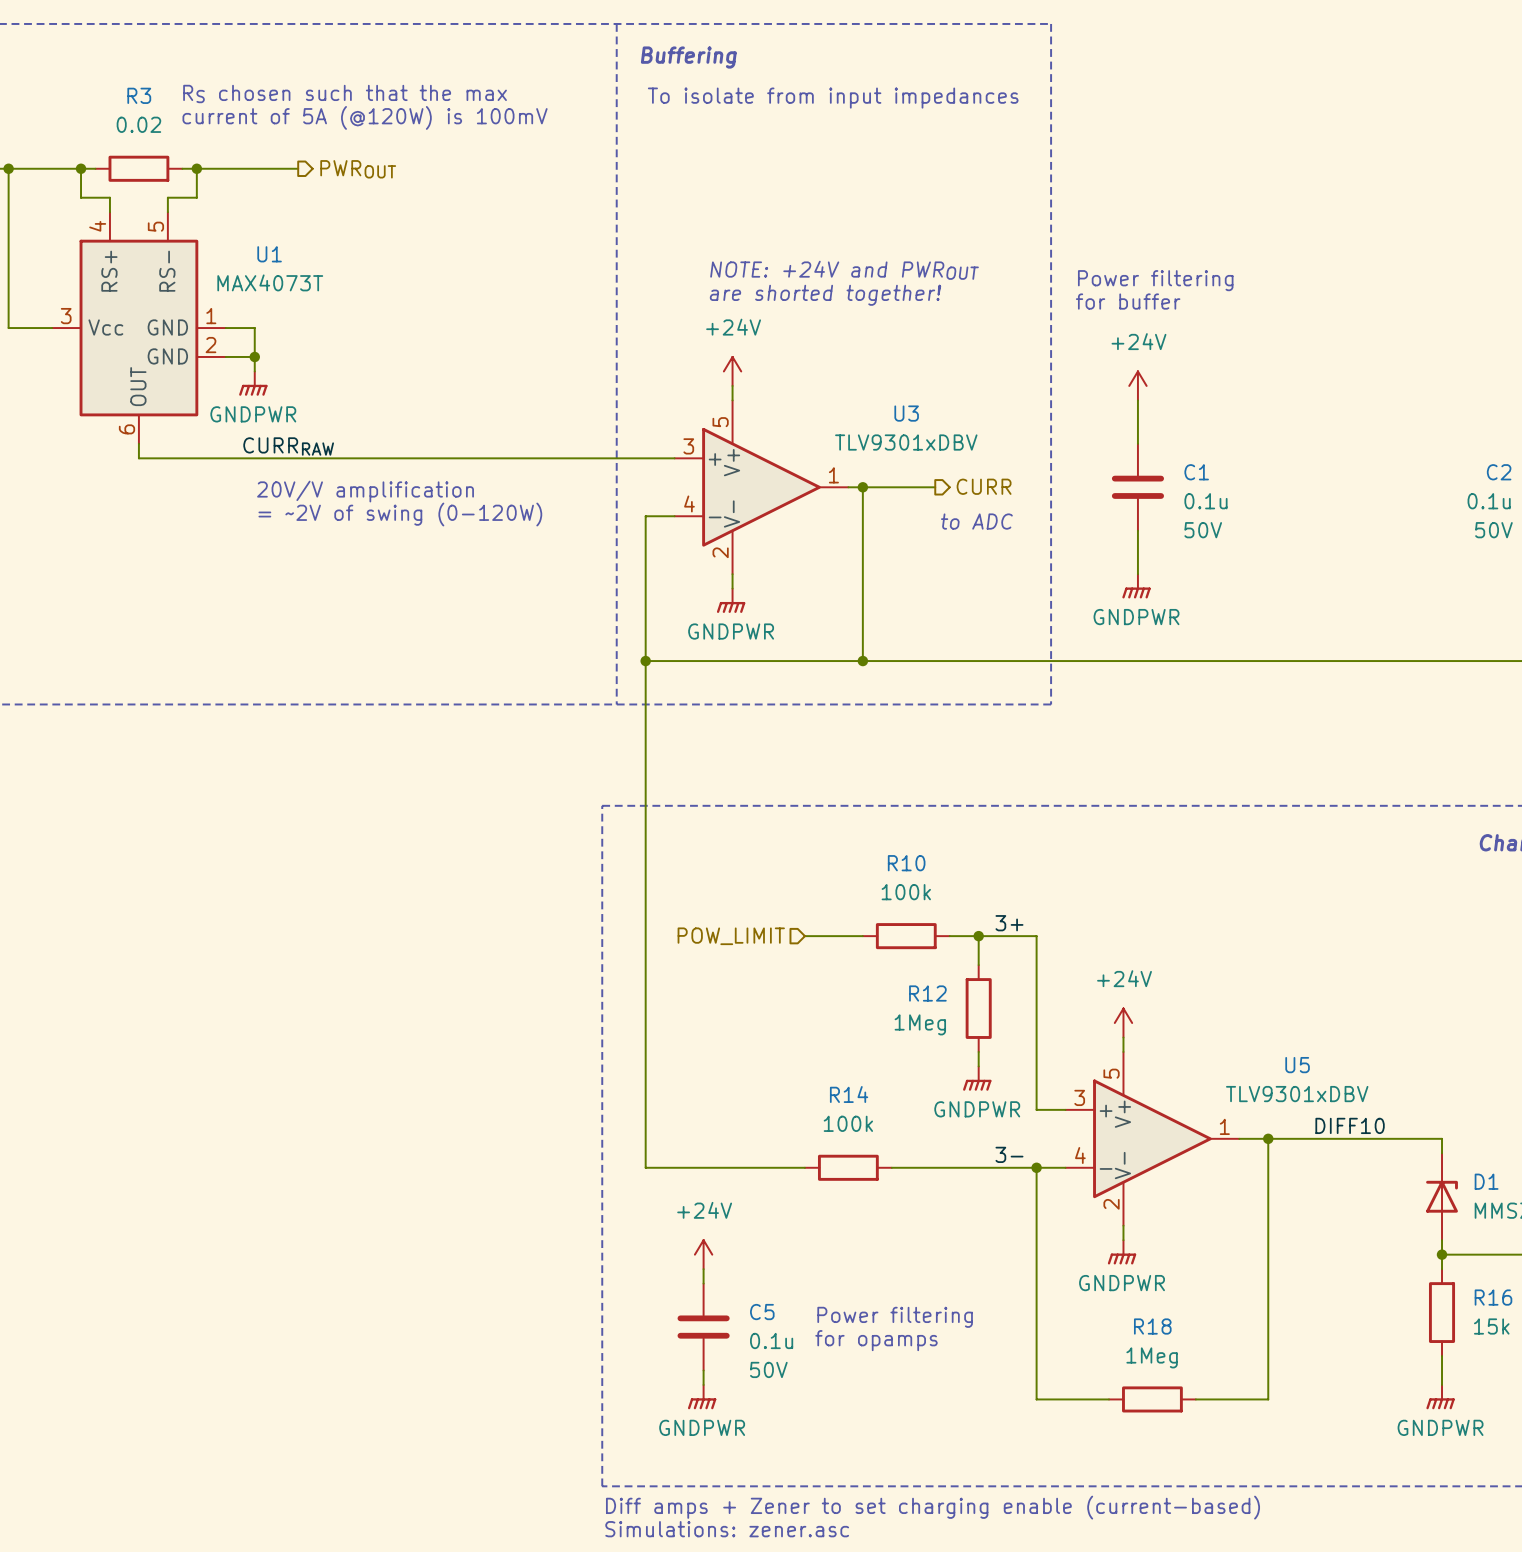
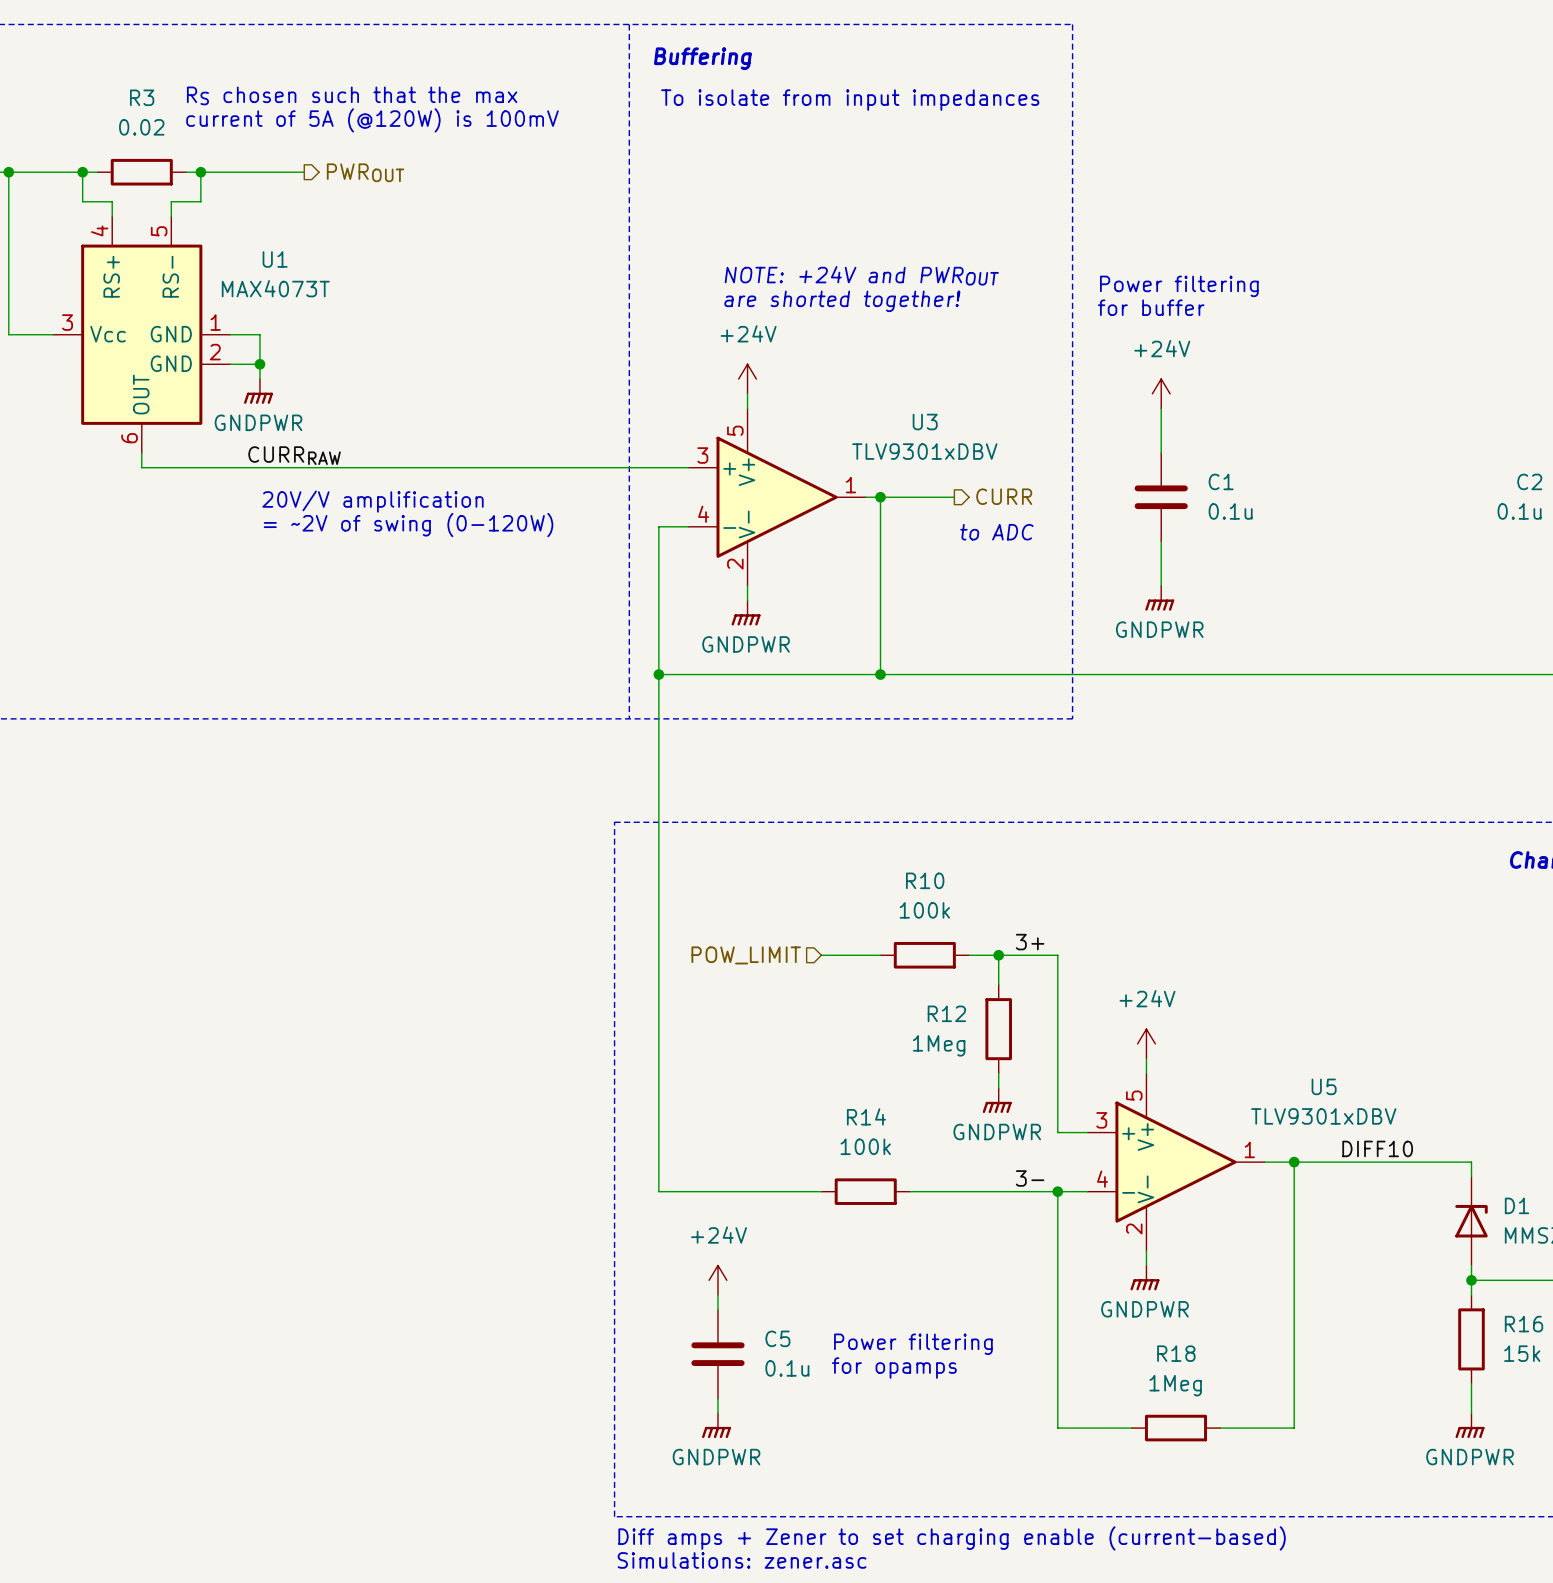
C1 text: 50V (1203, 530) -> none
C2 text: 50V (1493, 530) -> none
C5 text: 50V (768, 1369) -> none

